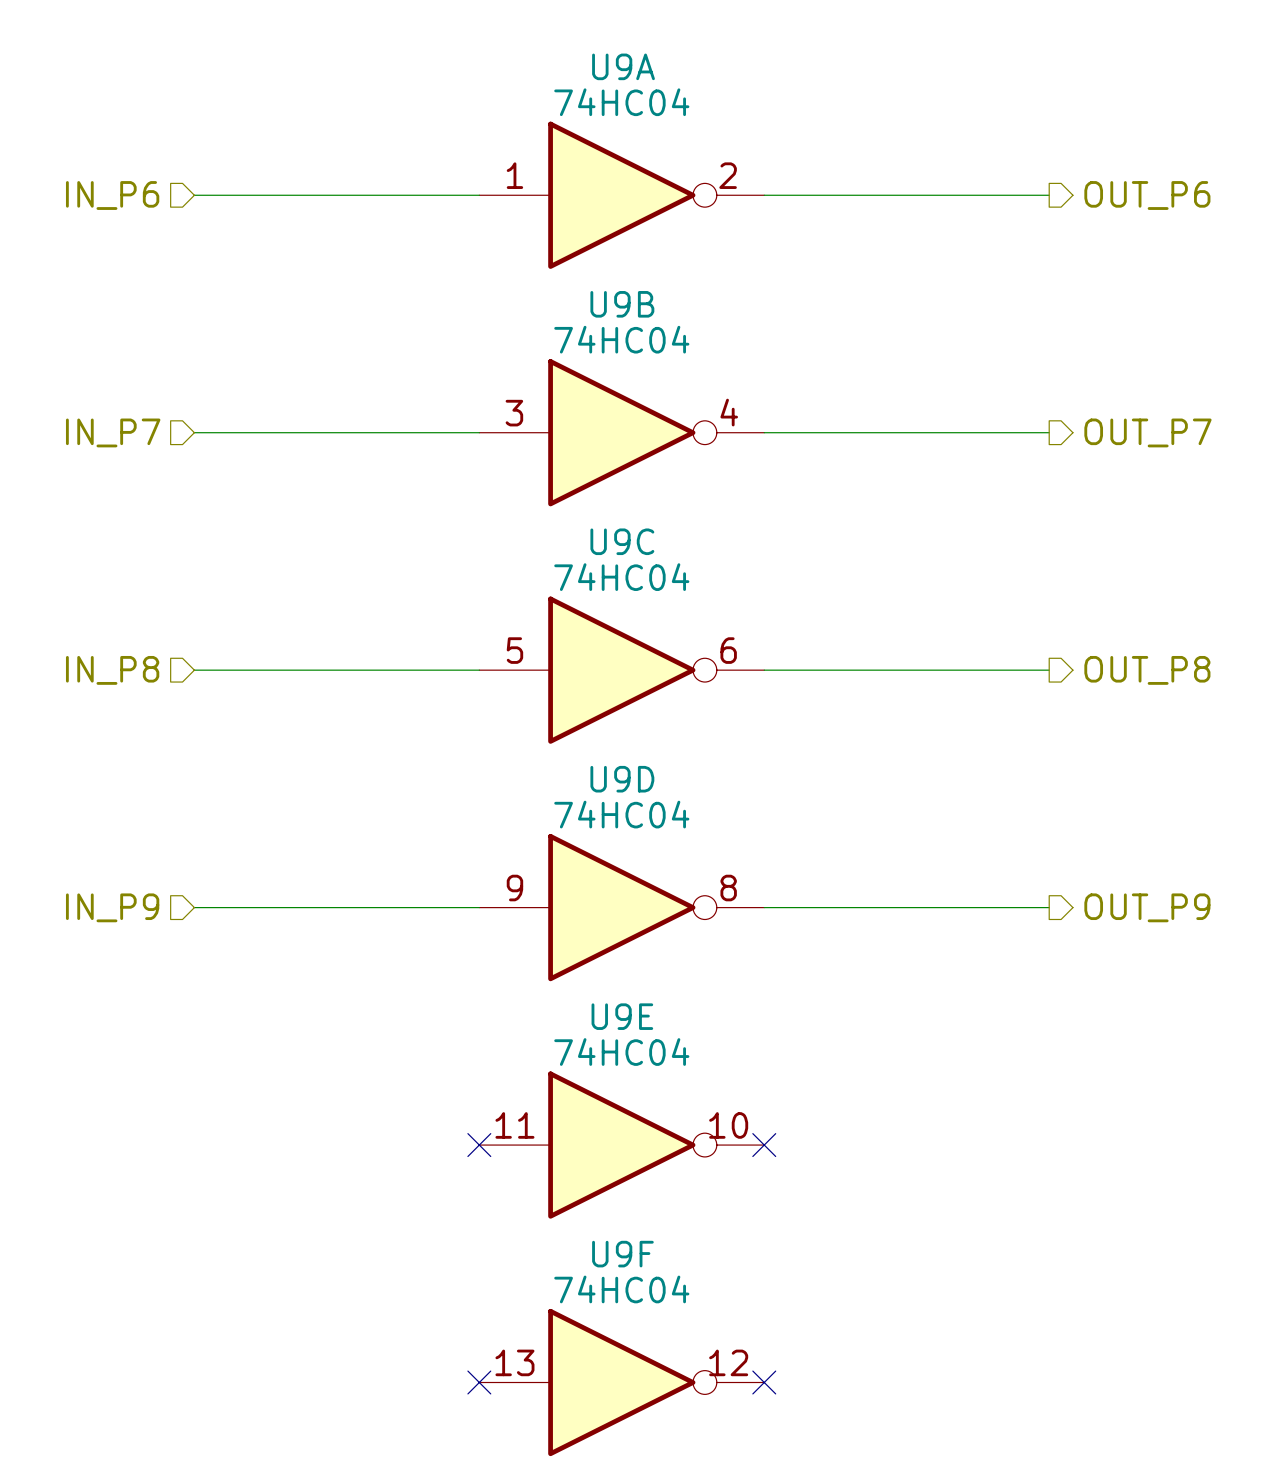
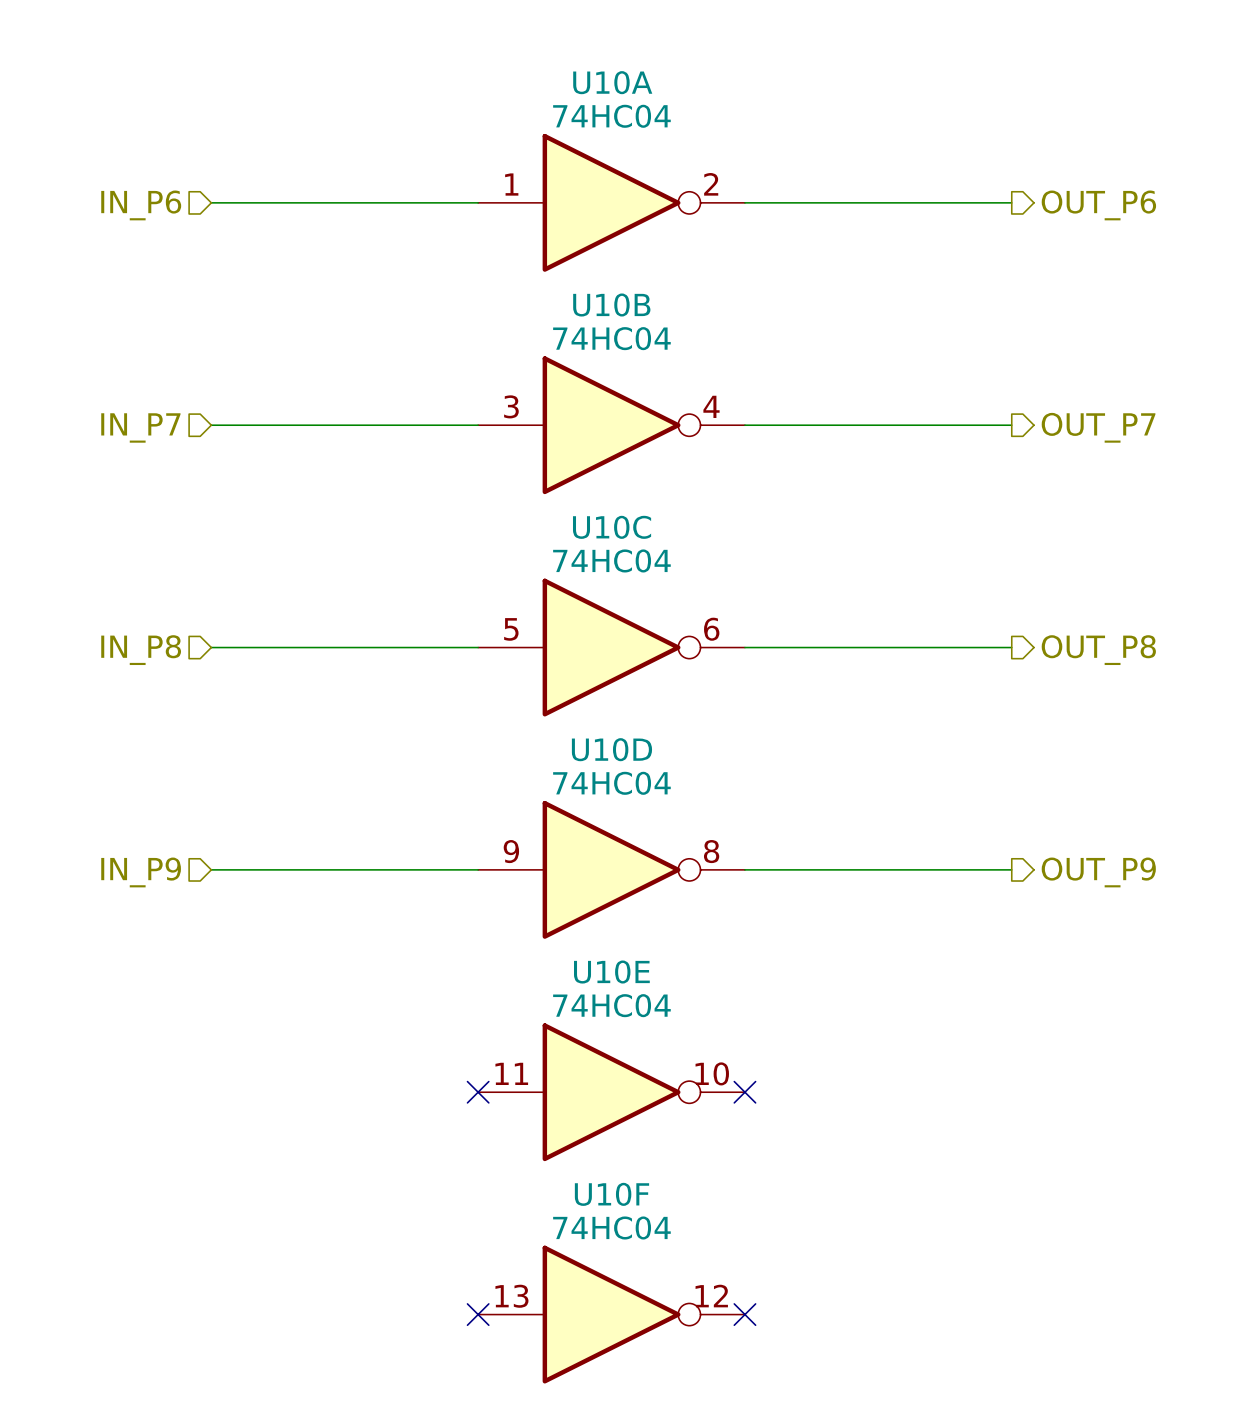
U9A name: U9A (623, 66) -> U10A (612, 82)
U9B name: U9B (622, 304) -> U10B (611, 304)
U9C name: U9C (622, 541) -> U10C (612, 527)
U9D name: U9D (622, 779) -> U10D (611, 749)
U9E name: U9E (622, 1016) -> U10E (611, 972)
U9F name: U9F (622, 1254) -> U10F (611, 1194)

